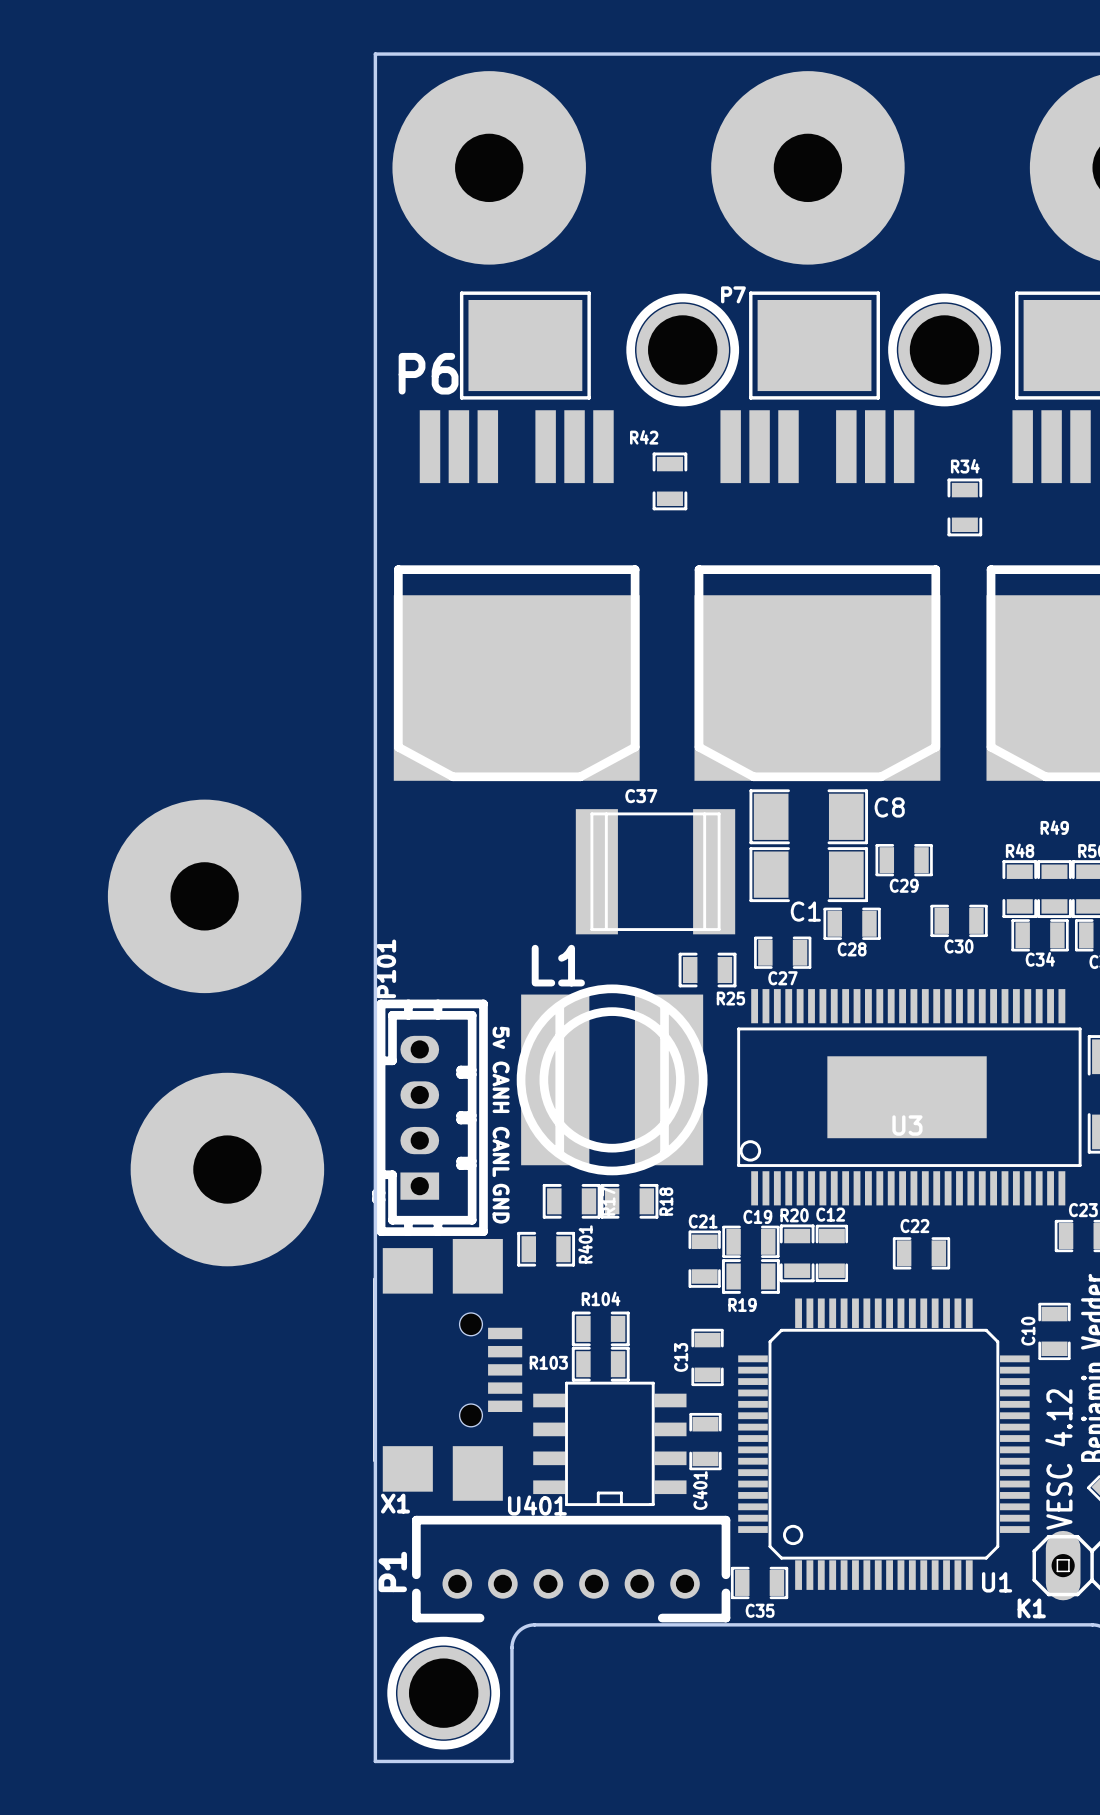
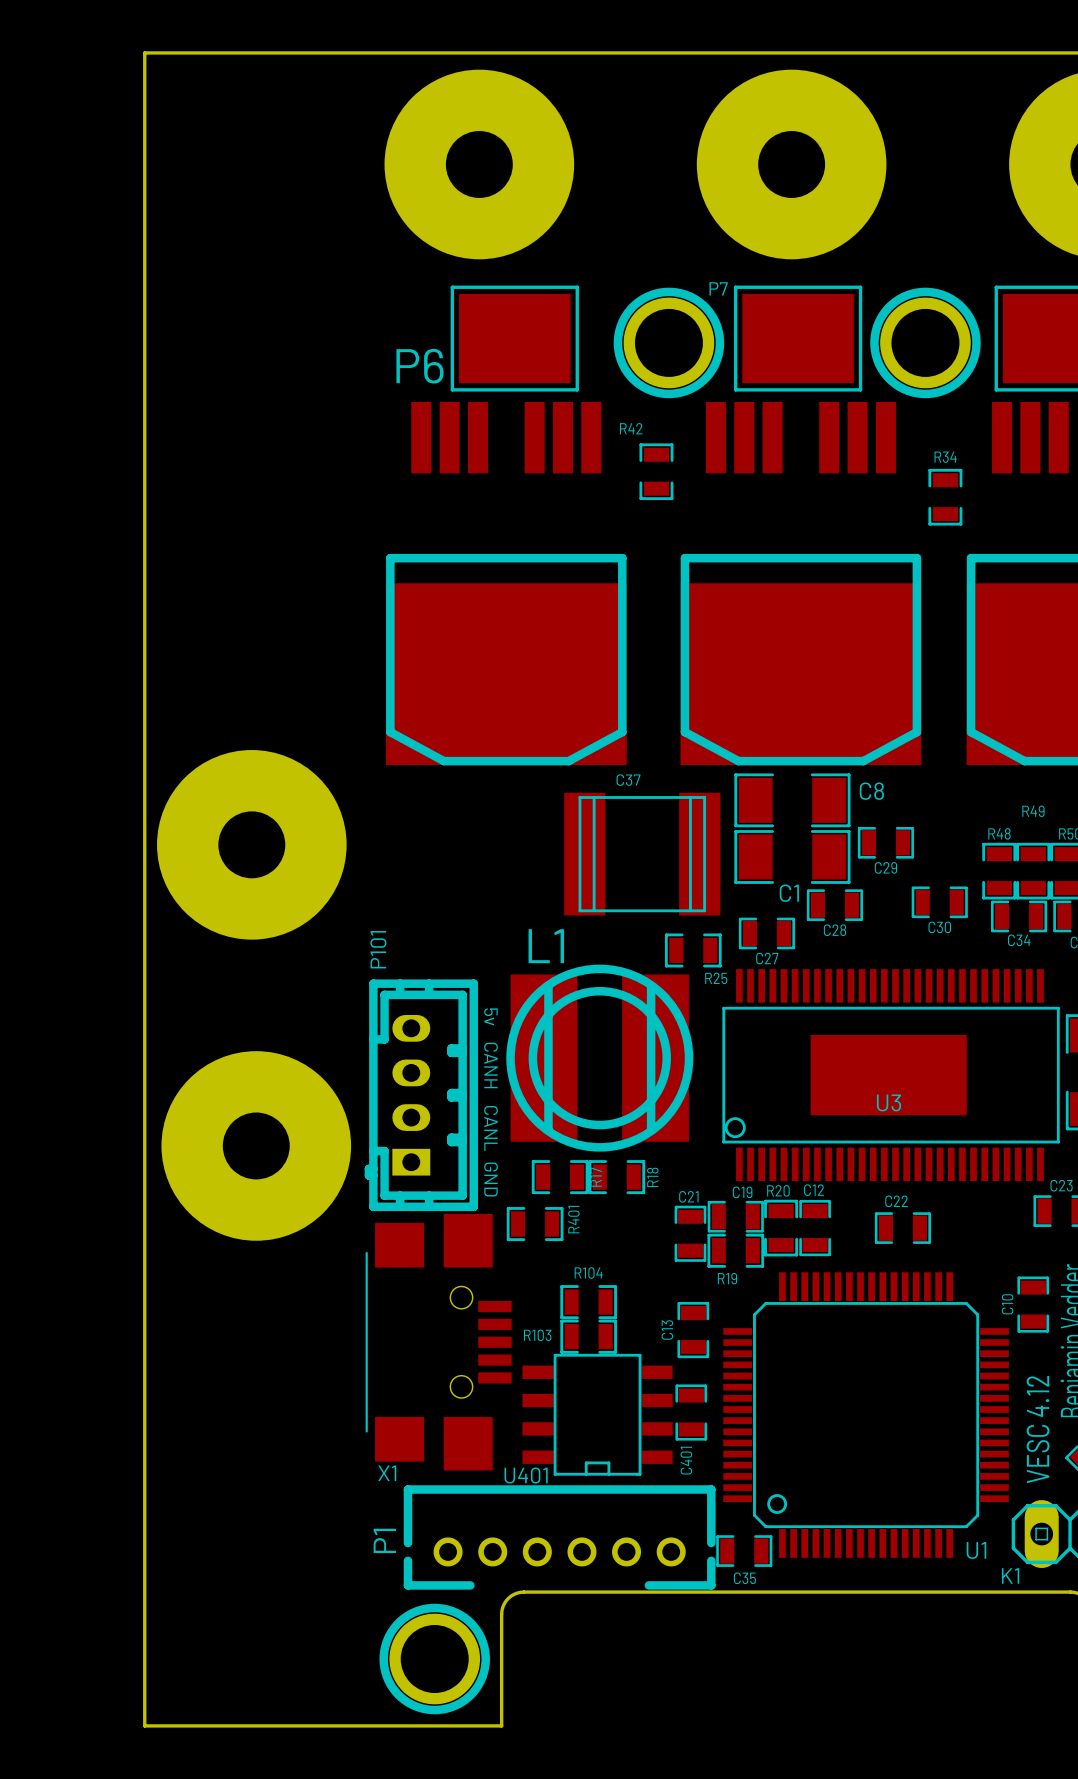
board edge: (375, 54) (375, 1761) -> (367, 52) (144, 52) (144, 1725) (367, 1725)
part position: (204, 896) -> (251, 844)
part position: (227, 1169) -> (256, 1145)

